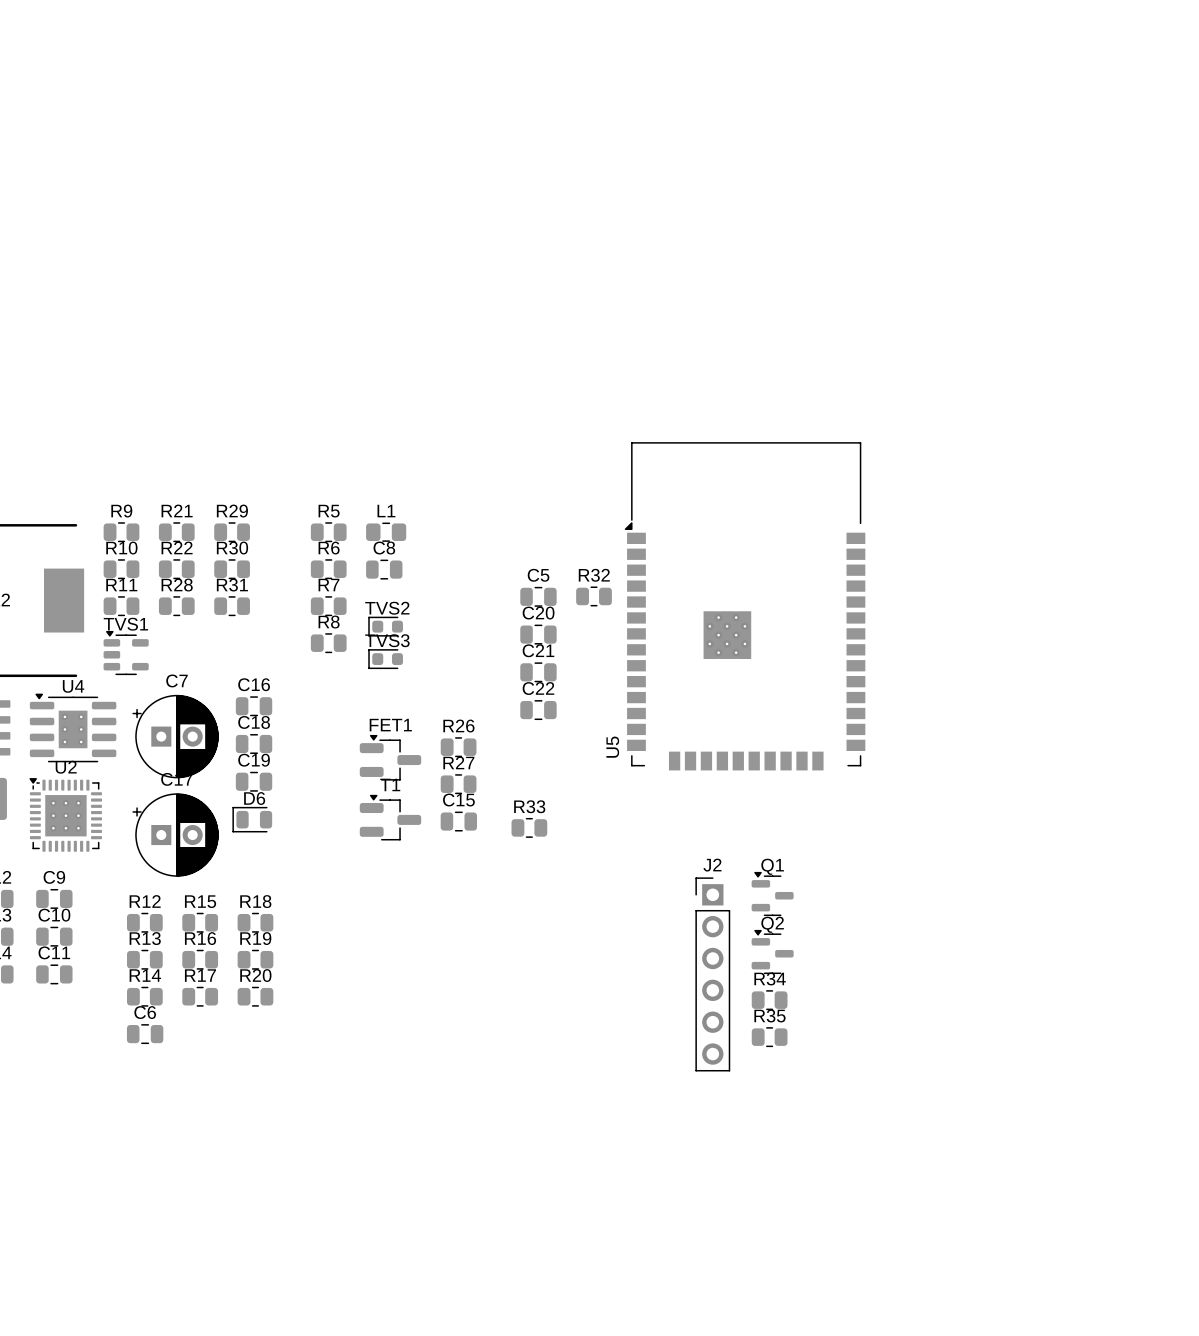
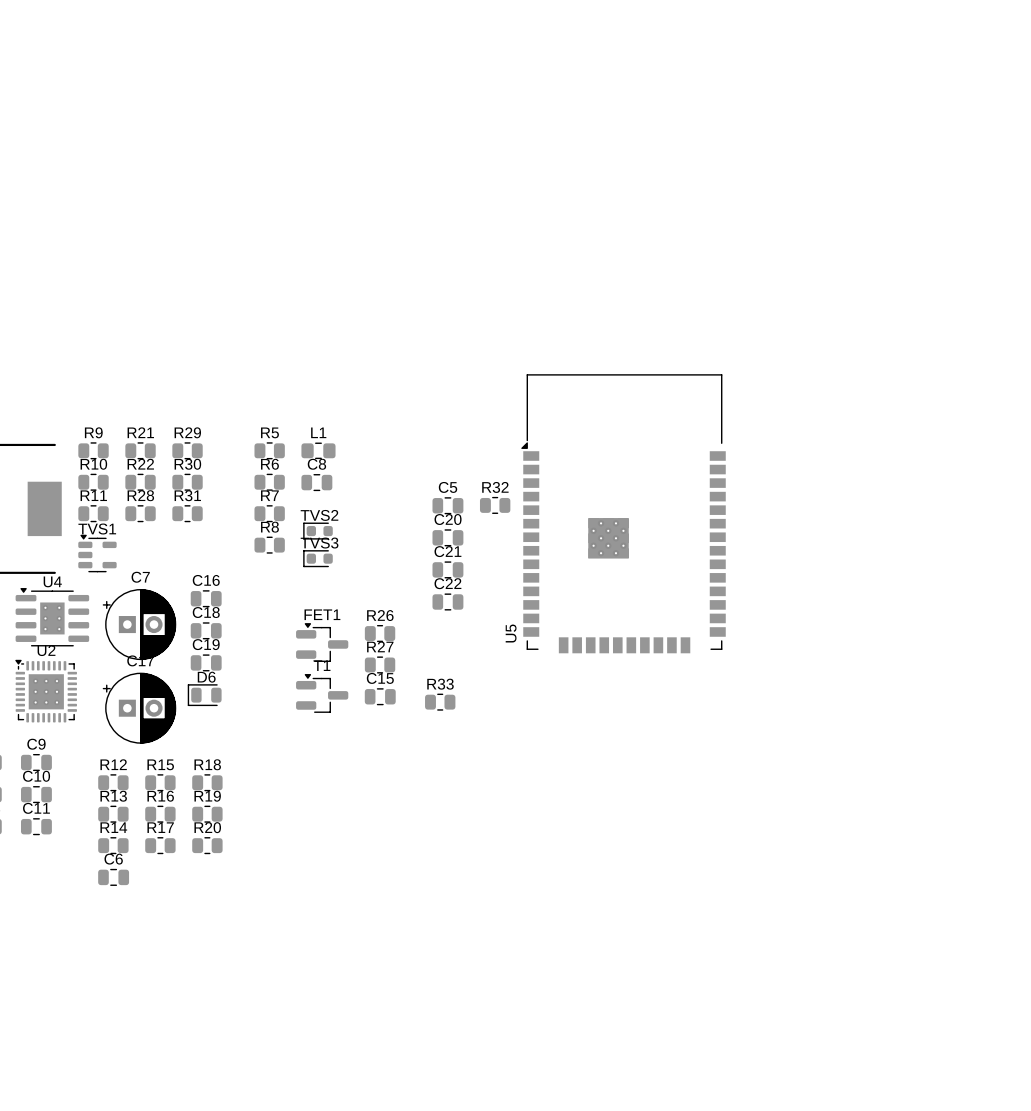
Q1: (772, 893) -> none
Q2: (772, 951) -> none
J2: (712, 974) -> none
R34: (769, 1000) -> none
R35: (769, 1037) -> none

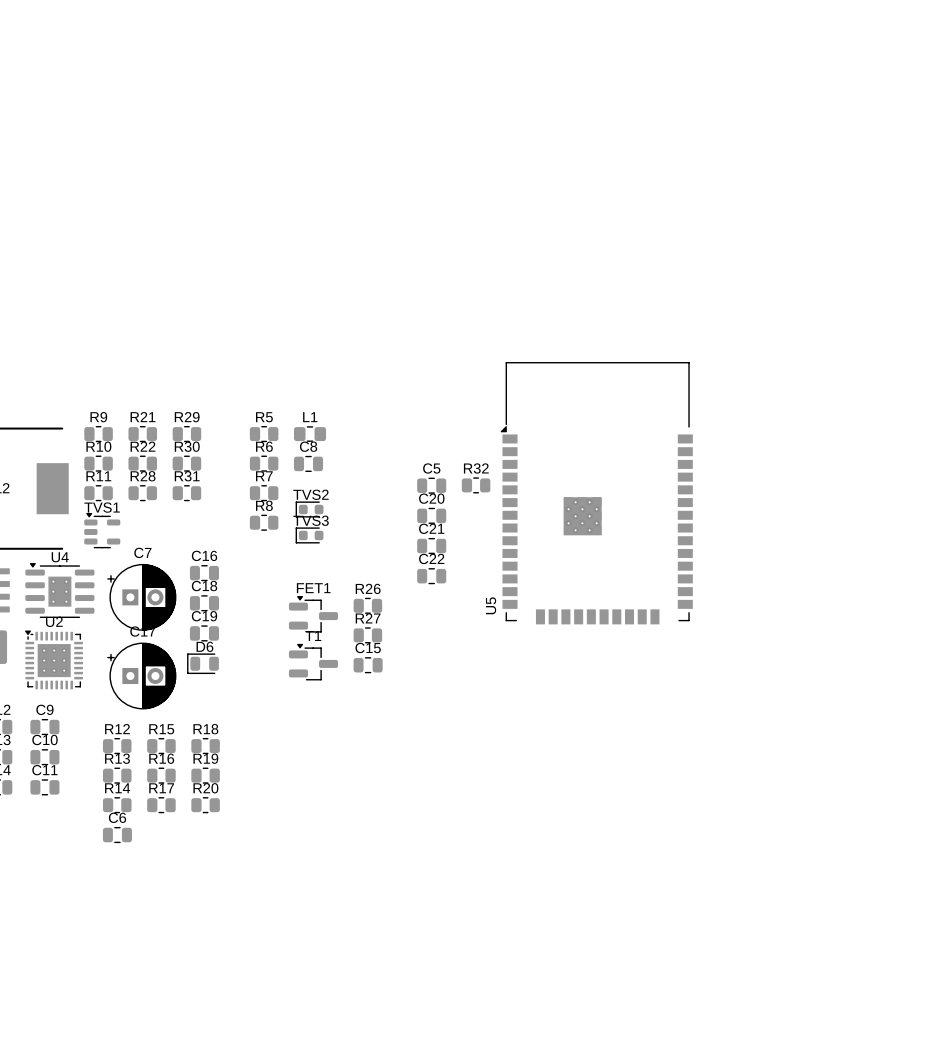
R33: (440, 702) -> none

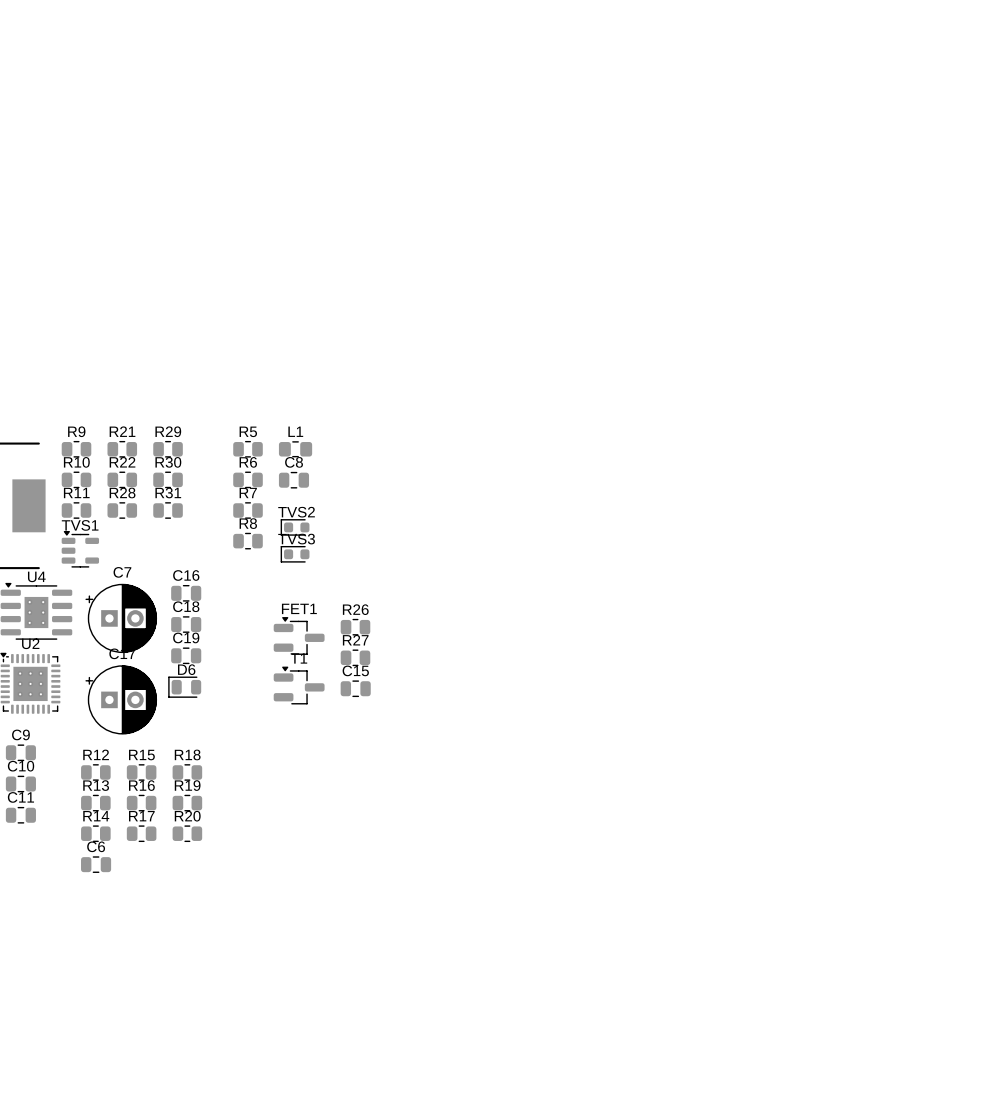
C5: (431, 485) -> none
R32: (476, 485) -> none
U5: (596, 493) -> none
C20: (431, 515) -> none
C21: (431, 546) -> none
C22: (431, 576) -> none

